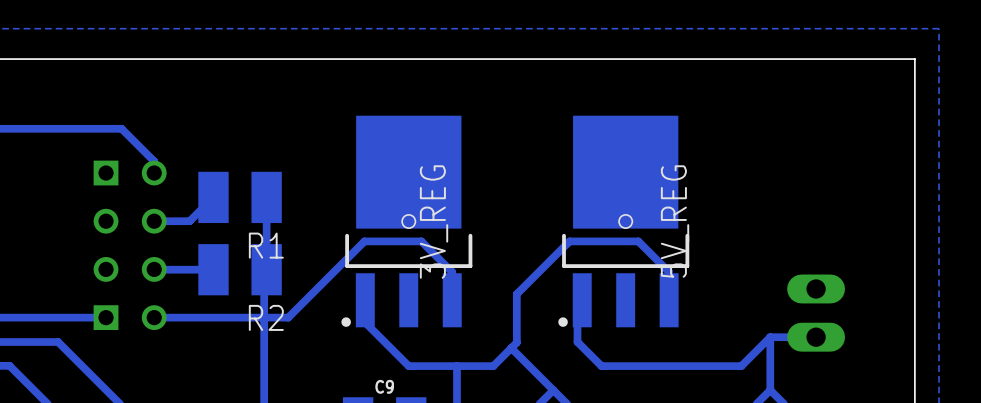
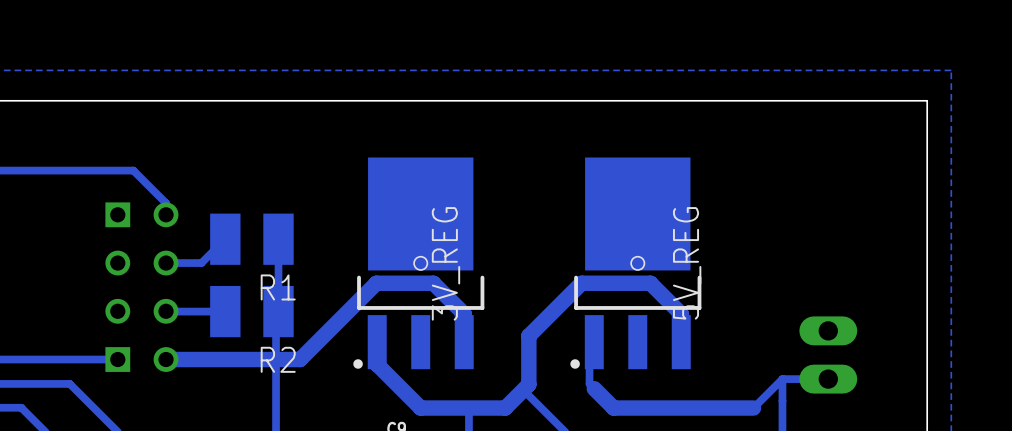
track width: thin (452, 300) (452, 272) (421, 241) (364, 241) (288, 317) (154, 317) -> thick (464, 342) (464, 314) (433, 283) (376, 283) (300, 359) (166, 359)
track width: thin (669, 300) (669, 272) (638, 241) (569, 241) (516, 294) (516, 342) (493, 366) (408, 366) (365, 322) (365, 300) -> thick (681, 342) (681, 314) (650, 283) (581, 283) (528, 336) (528, 384) (505, 408) (420, 408) (377, 364) (377, 342)
track width: thin (582, 346) (601, 366) (741, 366) -> thick (594, 388) (613, 408) (753, 408)

